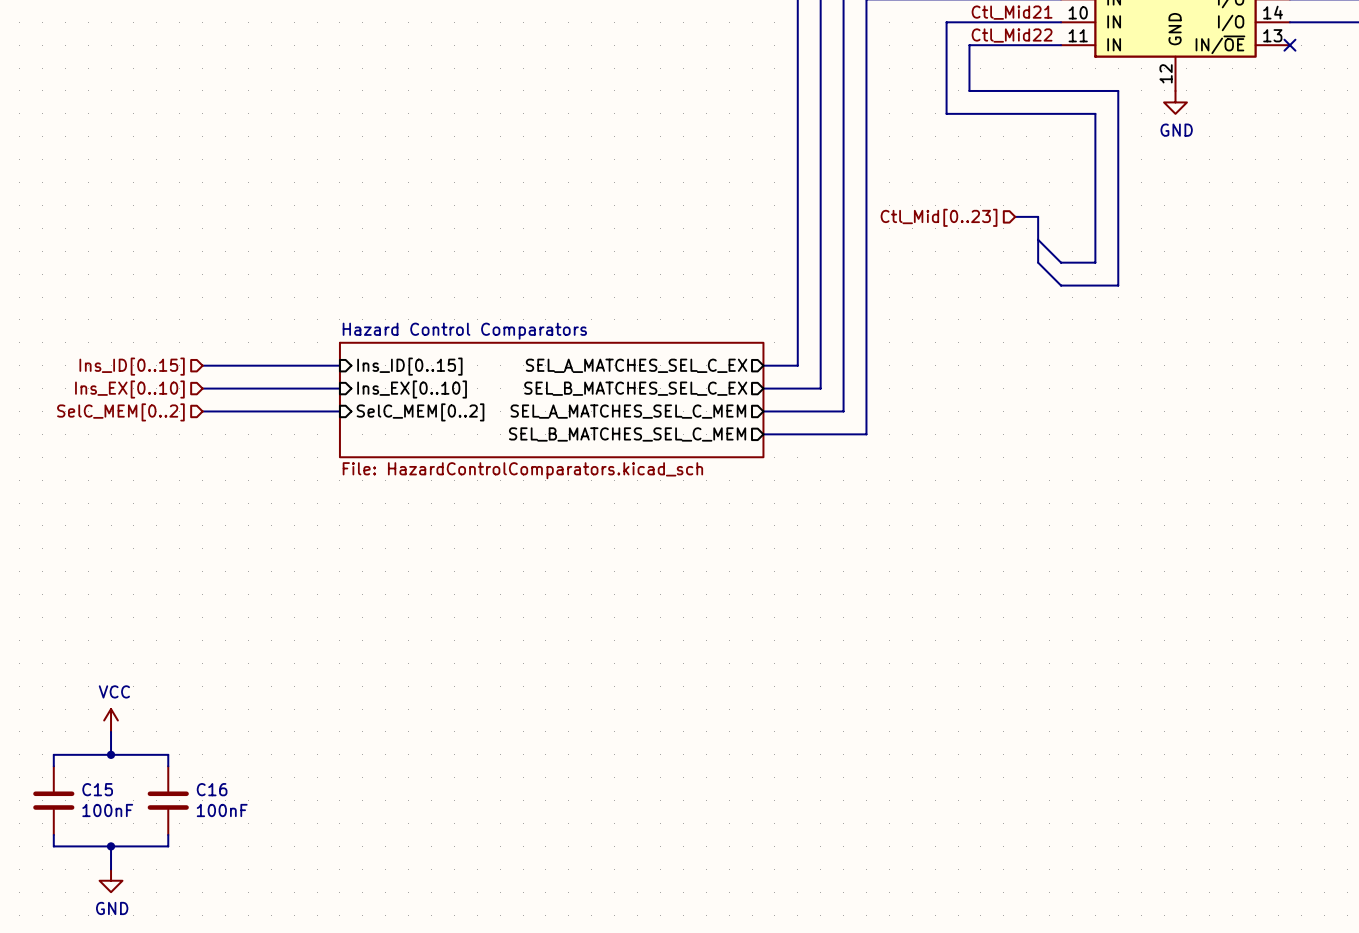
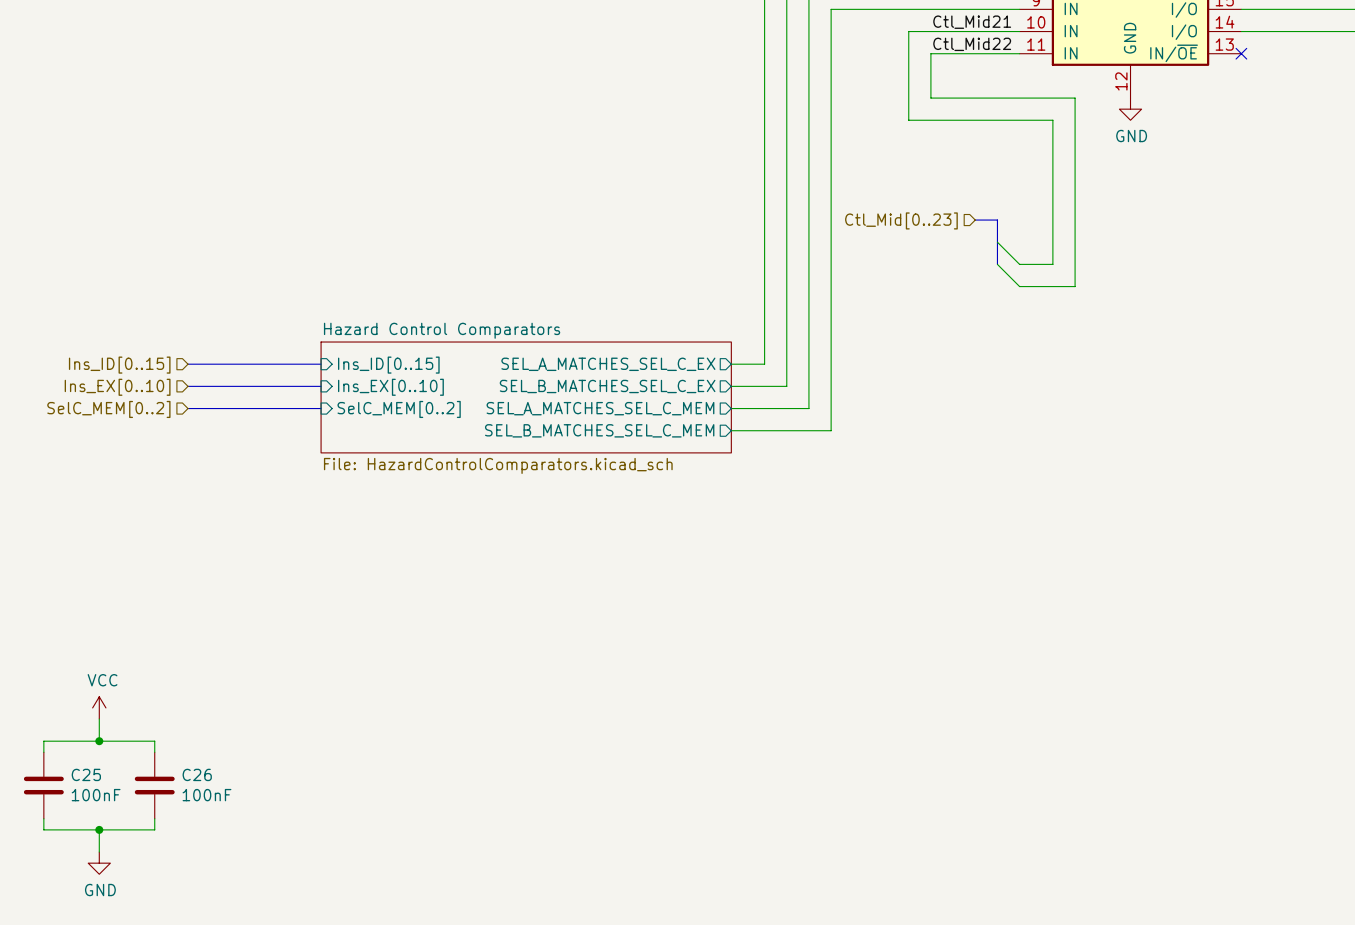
C15 name: C15 (97, 789) -> C25 (86, 774)
C16 name: C16 (212, 789) -> C26 (197, 774)

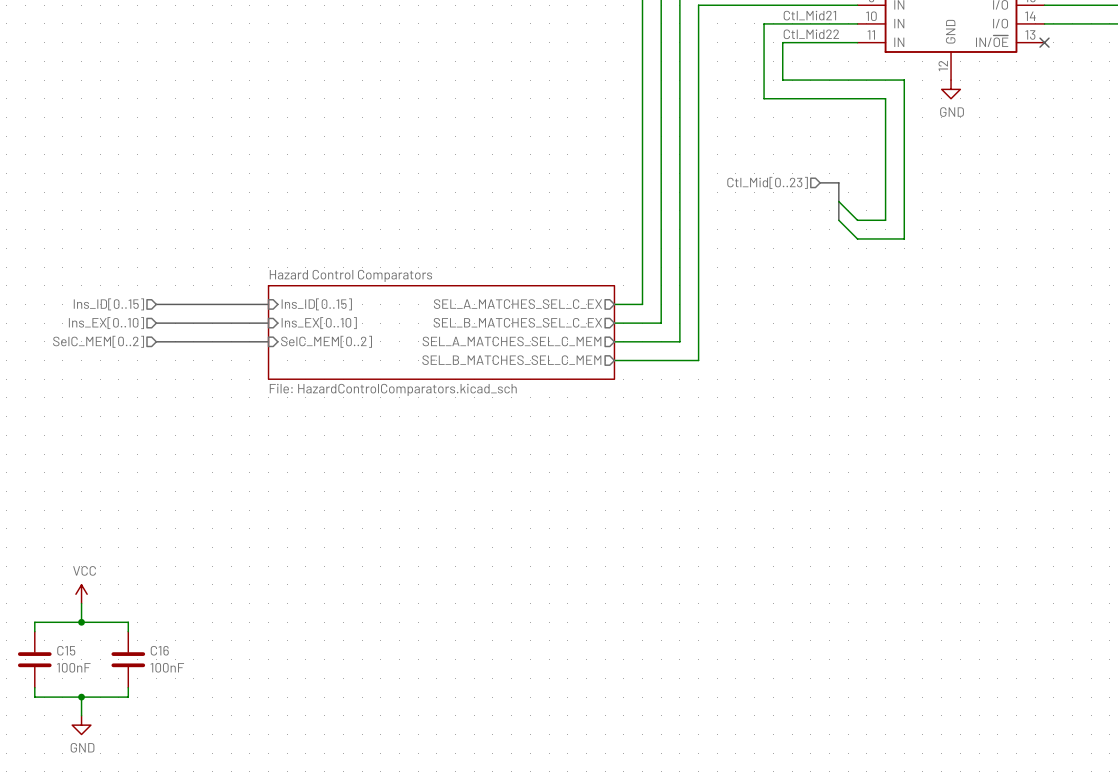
C25 name: C25 (86, 774) -> C15 (66, 650)
C26 name: C26 (197, 774) -> C16 (159, 650)

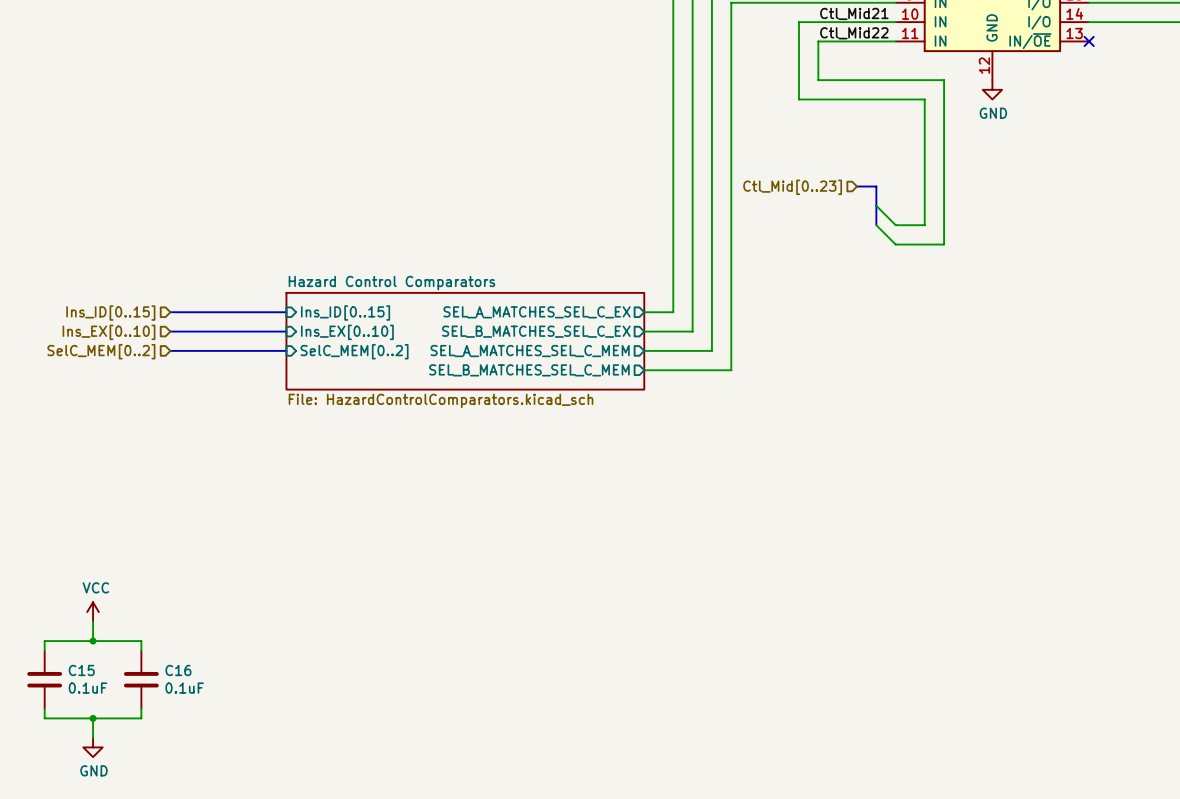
C15 value: 100nF (73, 667) -> 0.1uF (87, 688)
C16 value: 100nF (167, 667) -> 0.1uF (184, 688)

